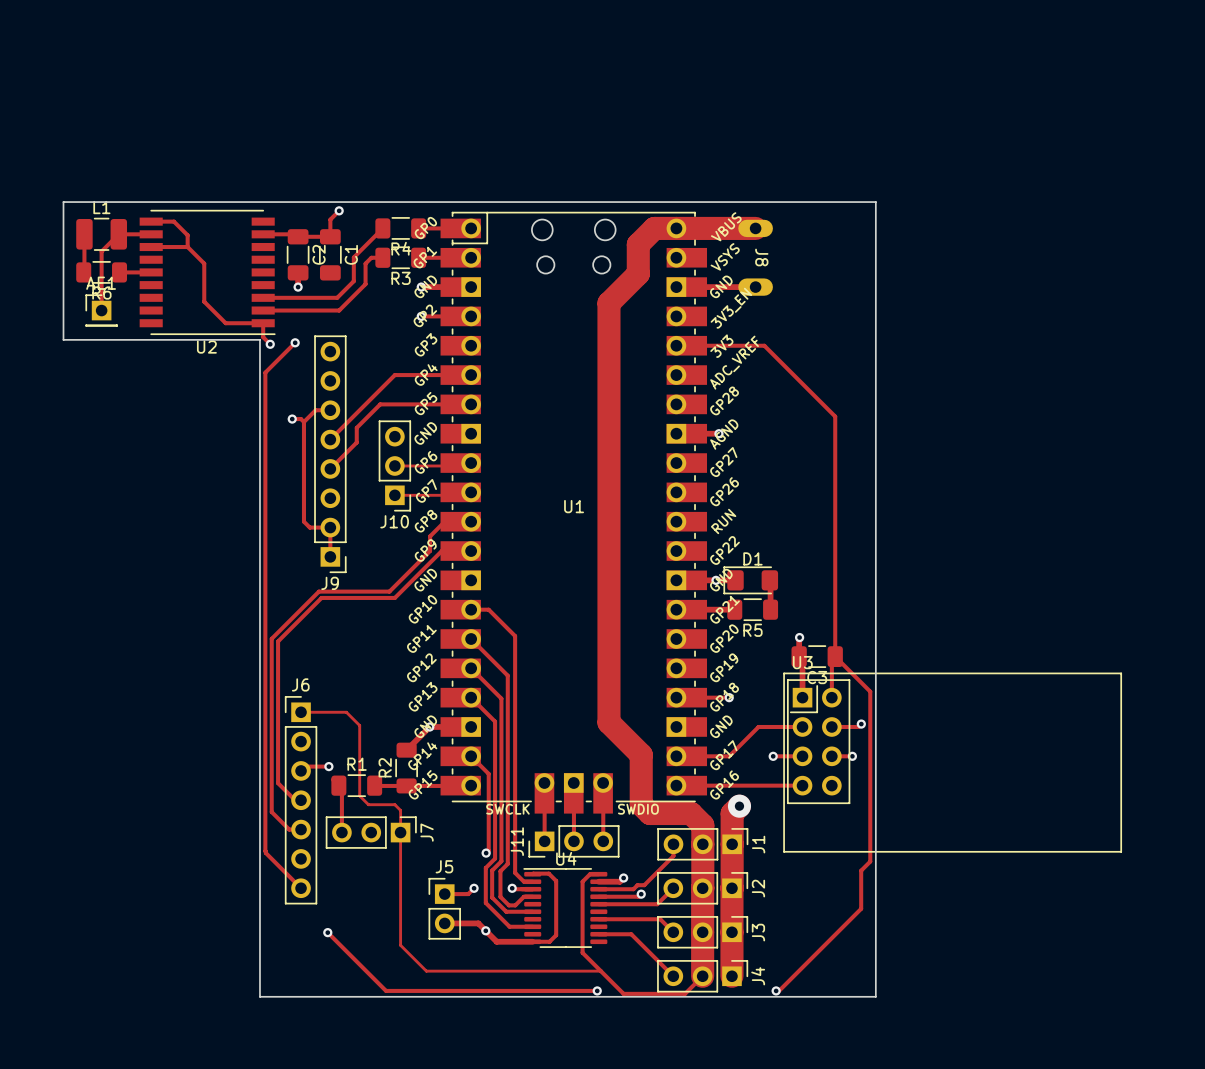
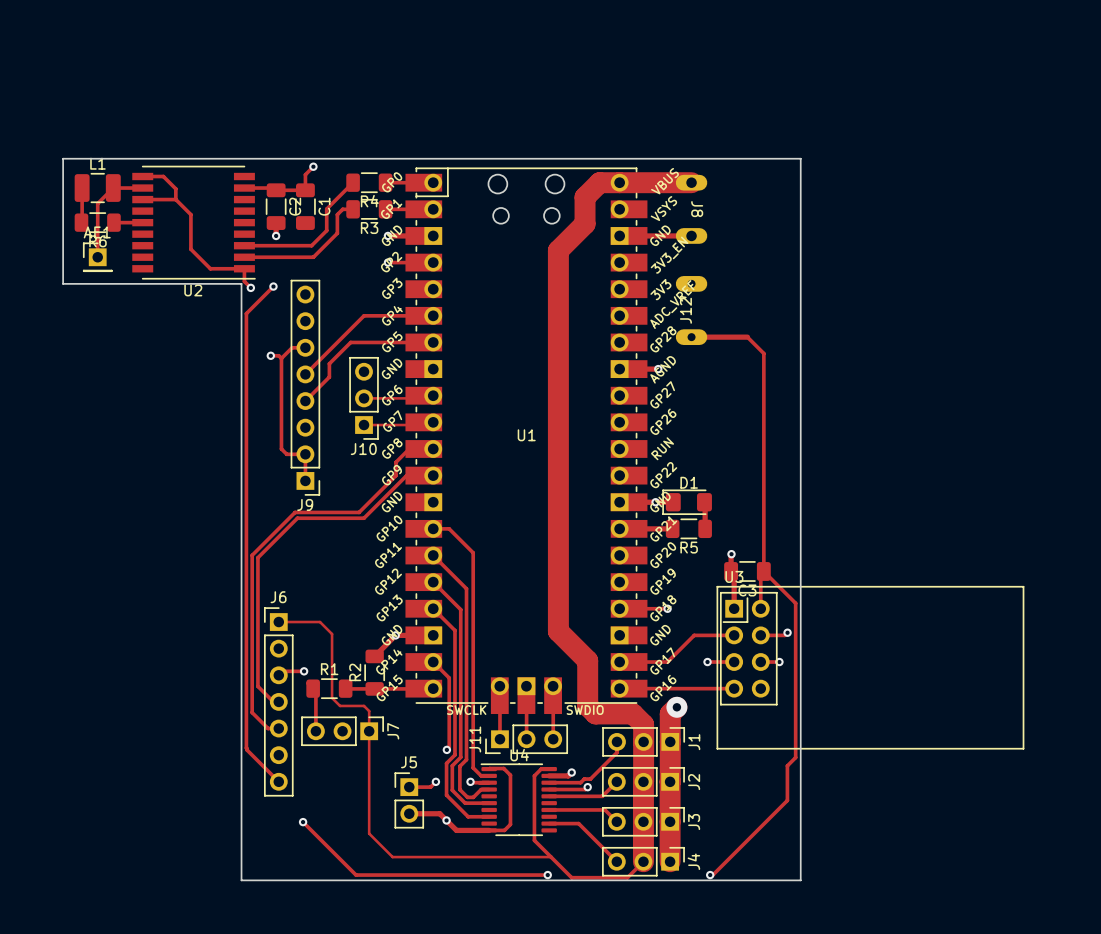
track: (676, 345) (764, 345) (817, 398) -> (691, 337) (747, 337)
J12: none -> (691, 310)

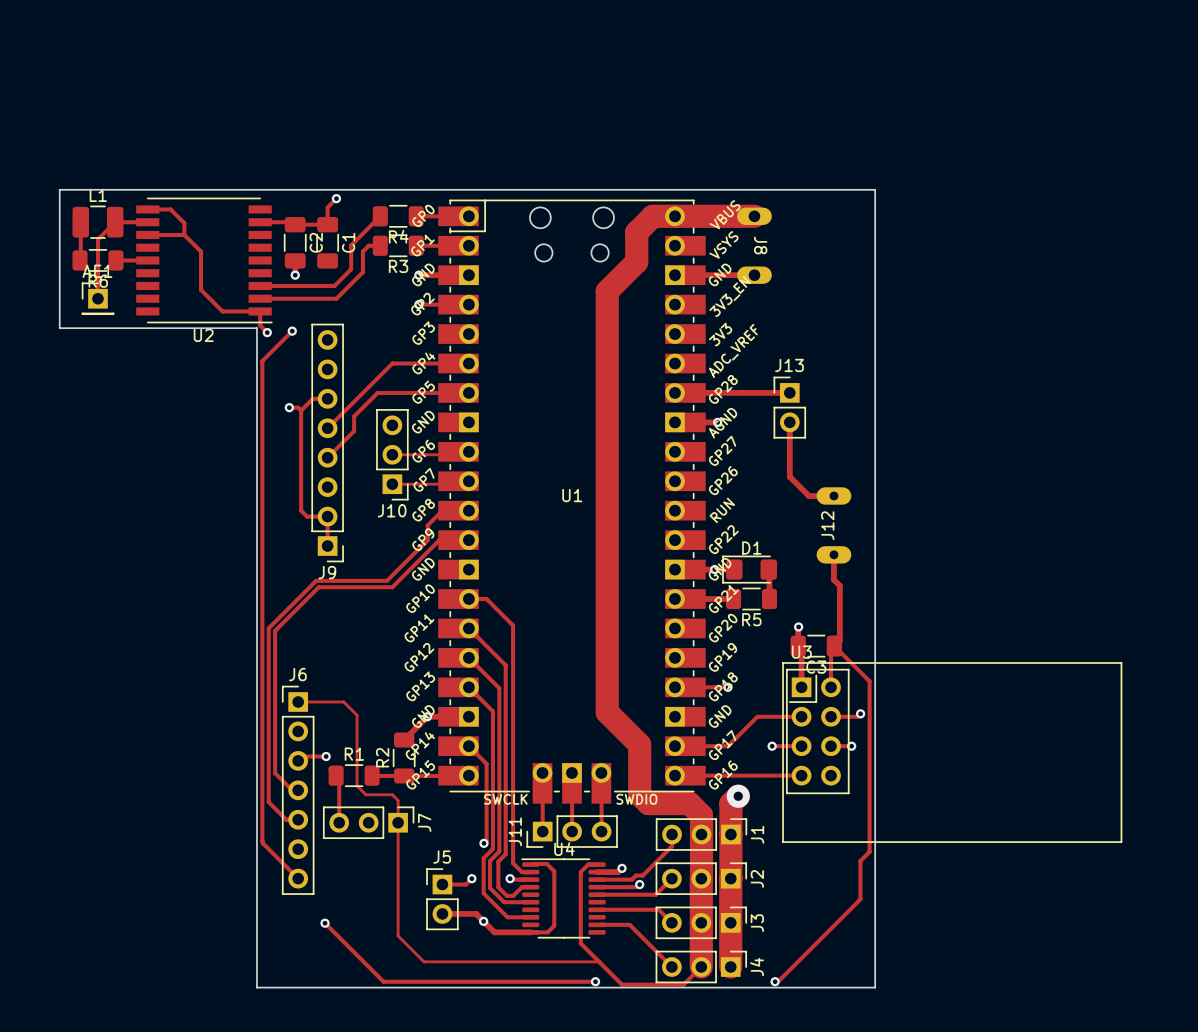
J12 position: (691, 310) -> (833, 525)
track: (691, 337) (747, 337) (763, 353) (763, 571) -> (833, 554) (833, 579) (839, 585) (839, 640) (834, 646)
track: none -> (675, 392) (789, 392)
J13: none -> (789, 407)
track: none -> (789, 422) (789, 476) (808, 495) (833, 495)

